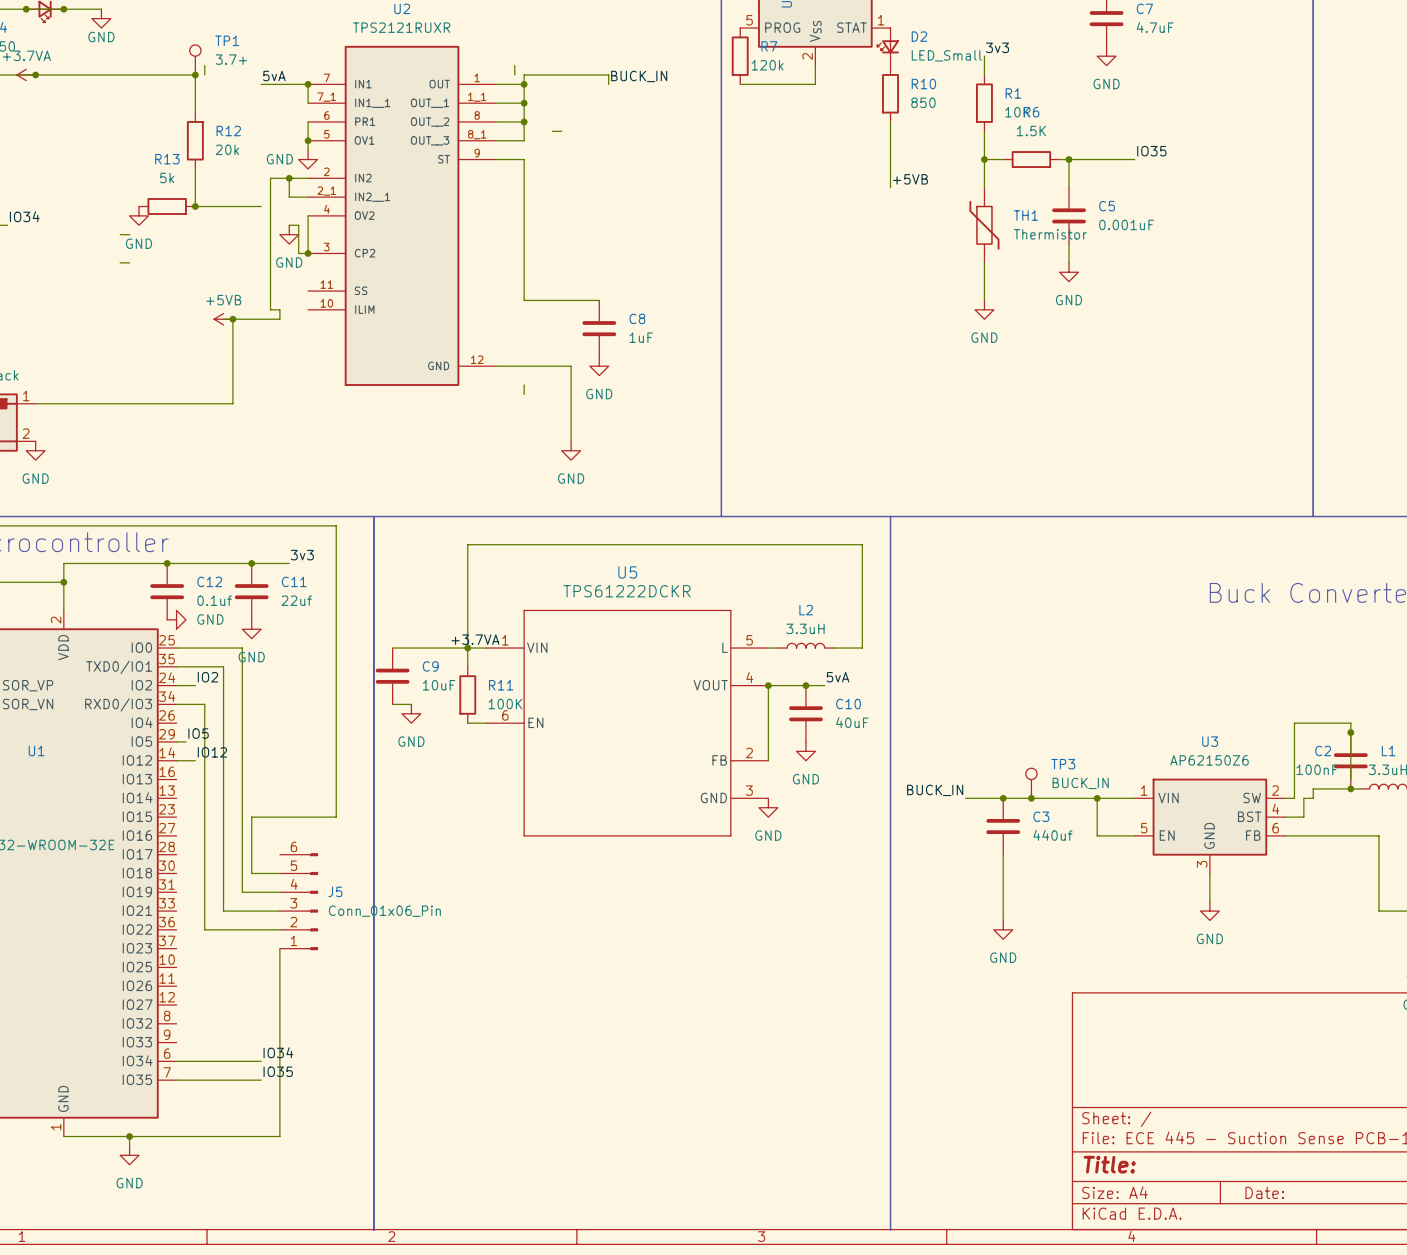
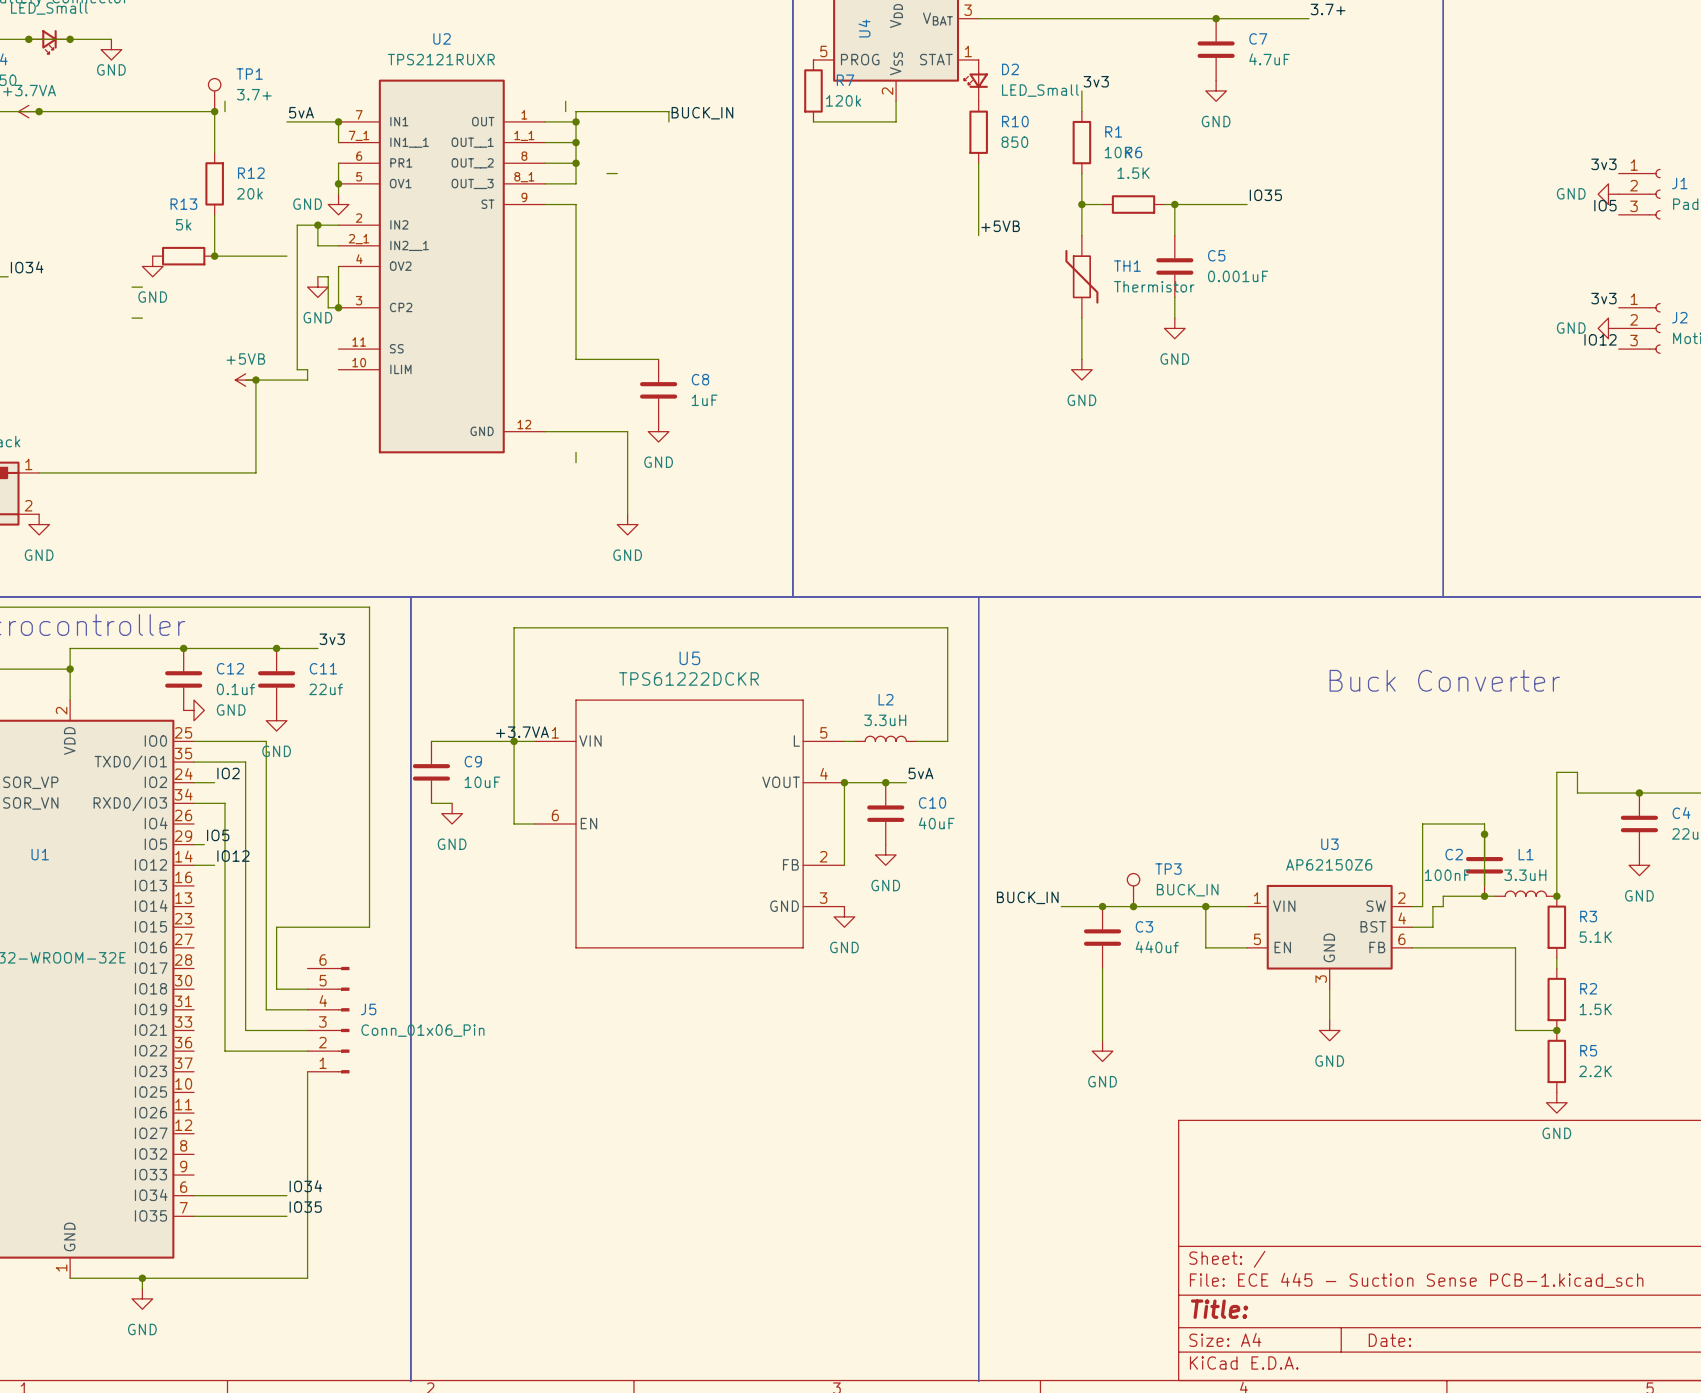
wire: none -> (514, 762) (514, 823)
R11: 100K (467, 695) -> none

